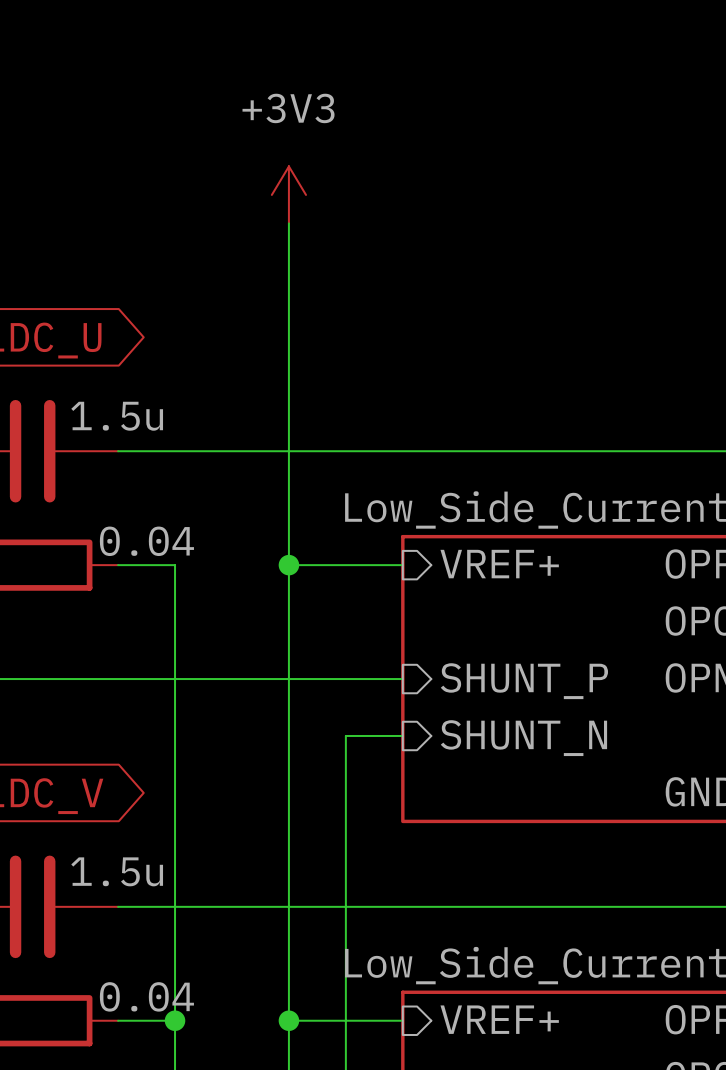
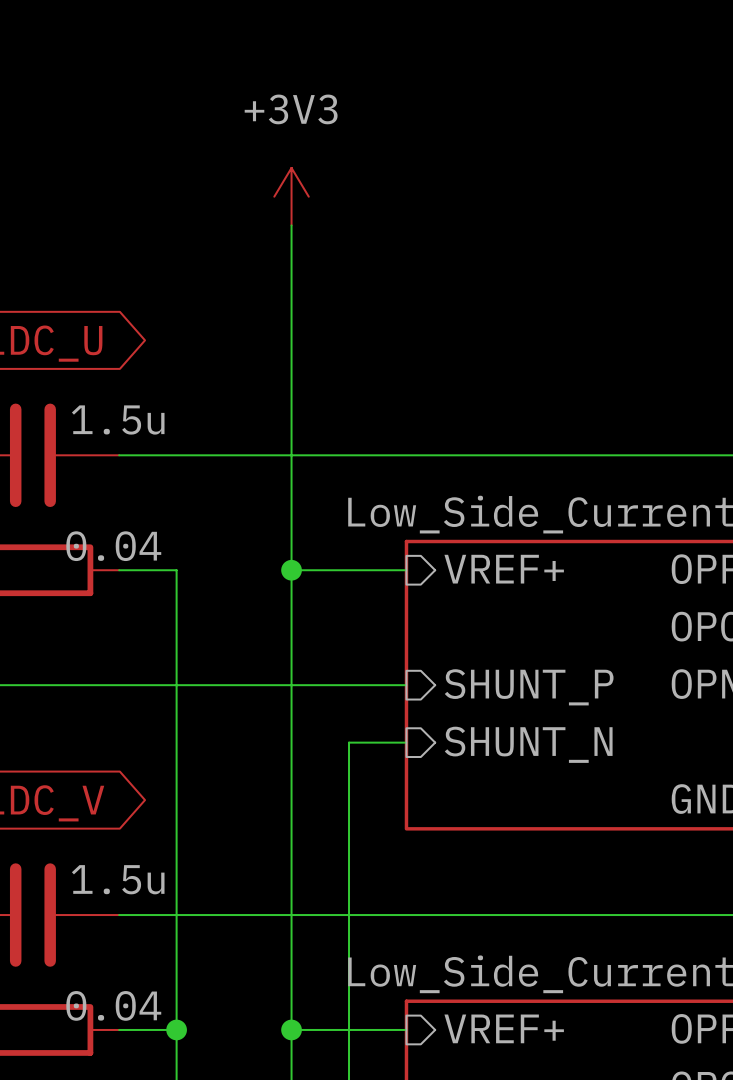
part value position: 0.04 (146, 541) -> 0.04 (113, 546)
part value position: 0.04 (146, 996) -> 0.04 (113, 1005)

